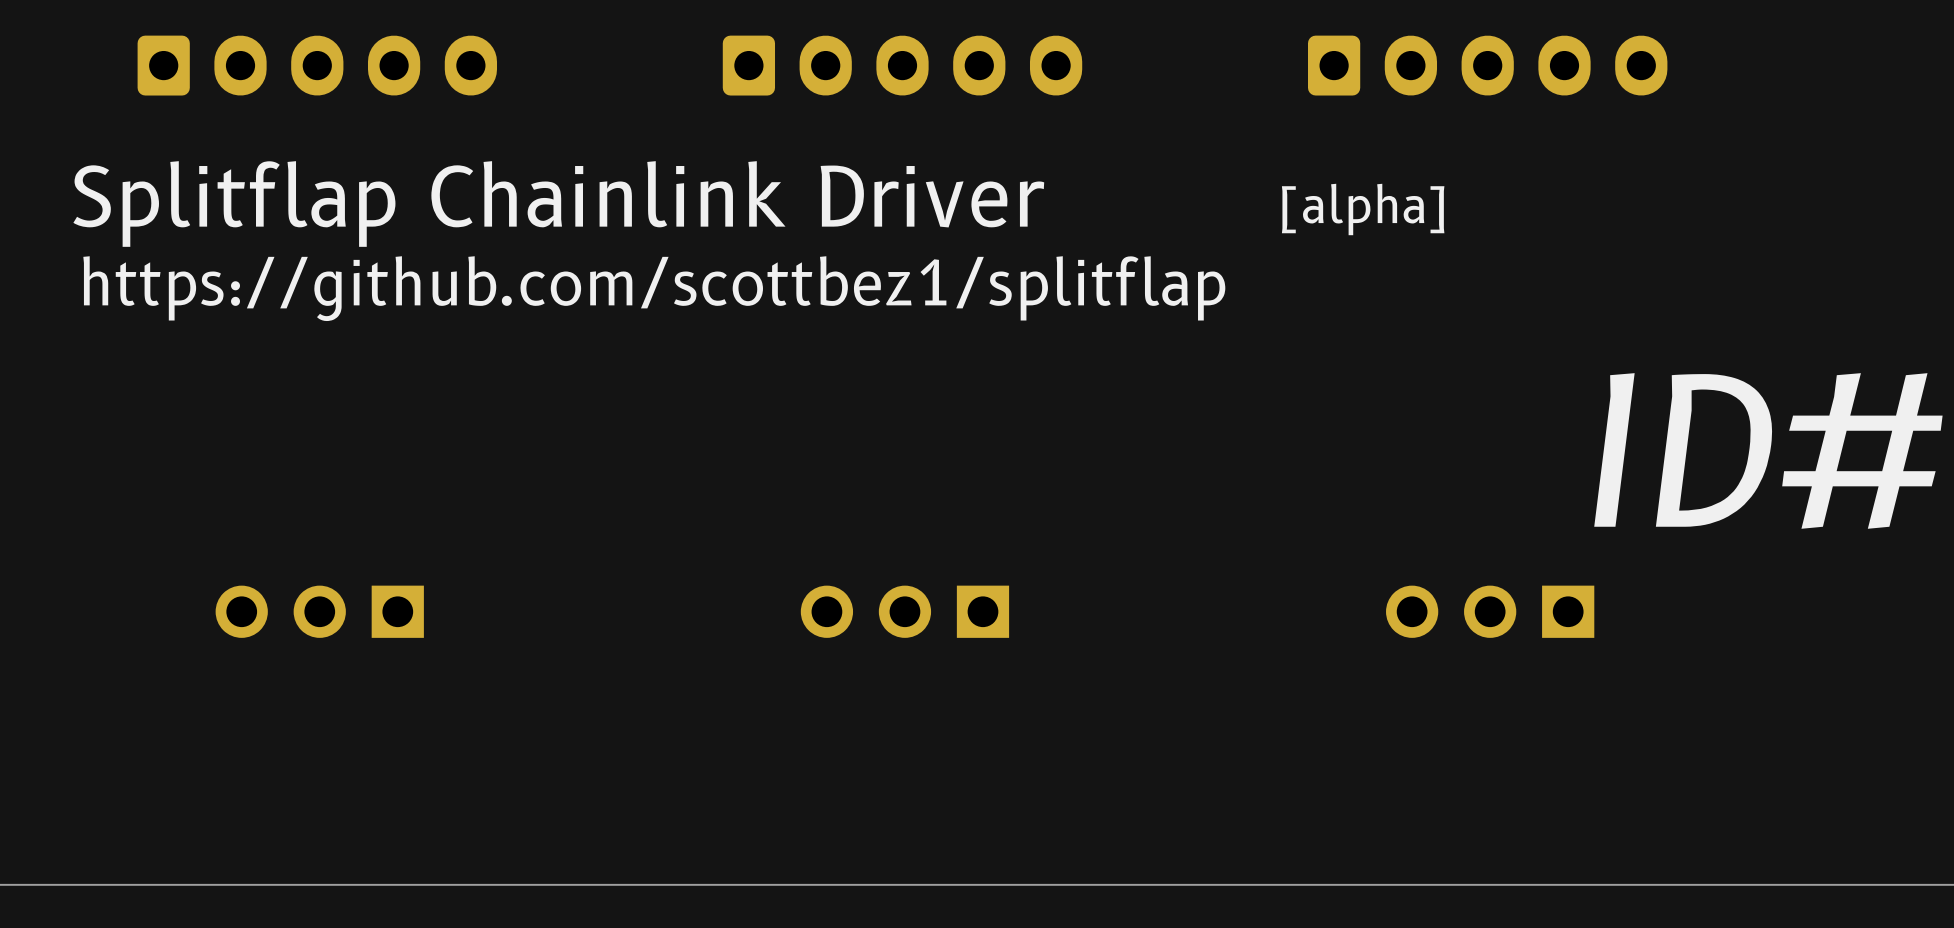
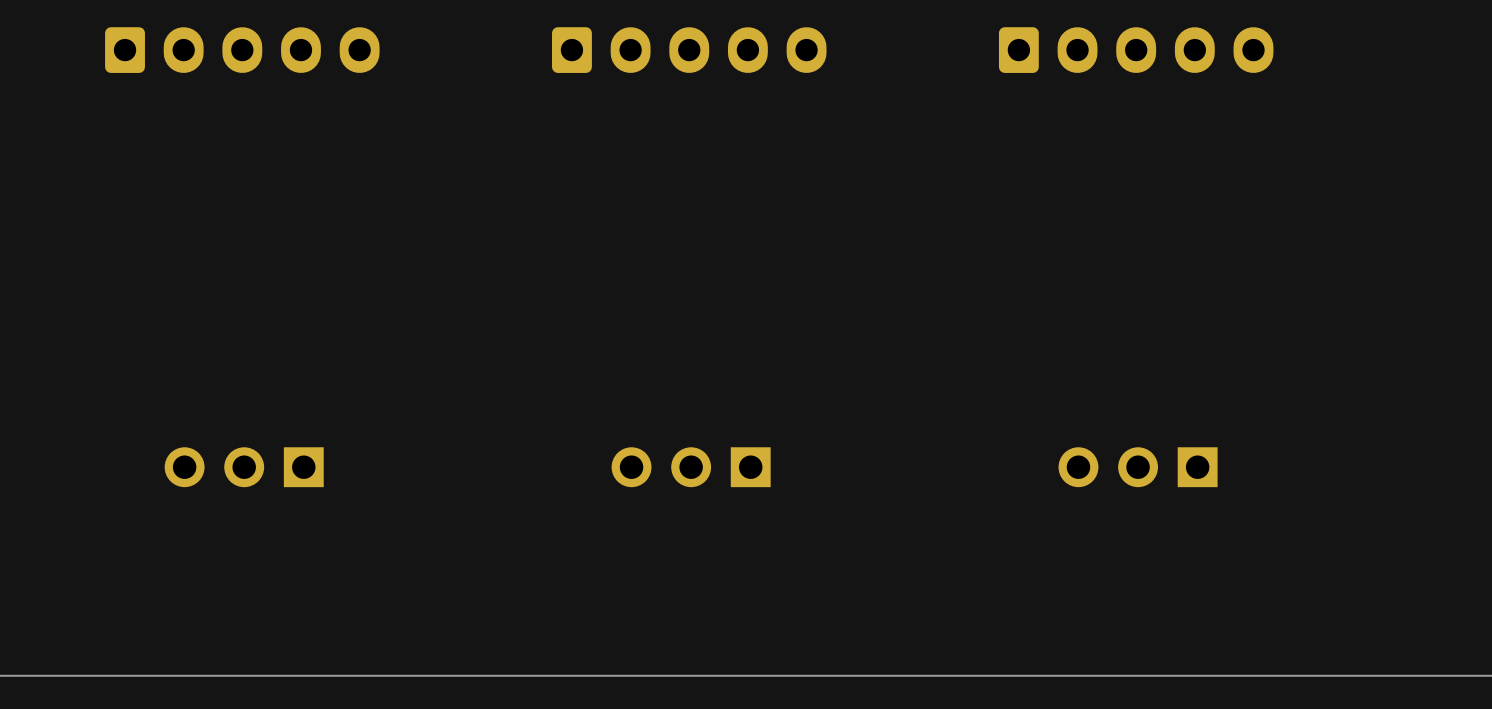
text: Splitflap Chainlink Driver (558, 204) -> none
text: [alpha] (1363, 209) -> none
text: https://github.com/scottbez1/splitflap (654, 288) -> none
text: ID# (1768, 450) -> none

